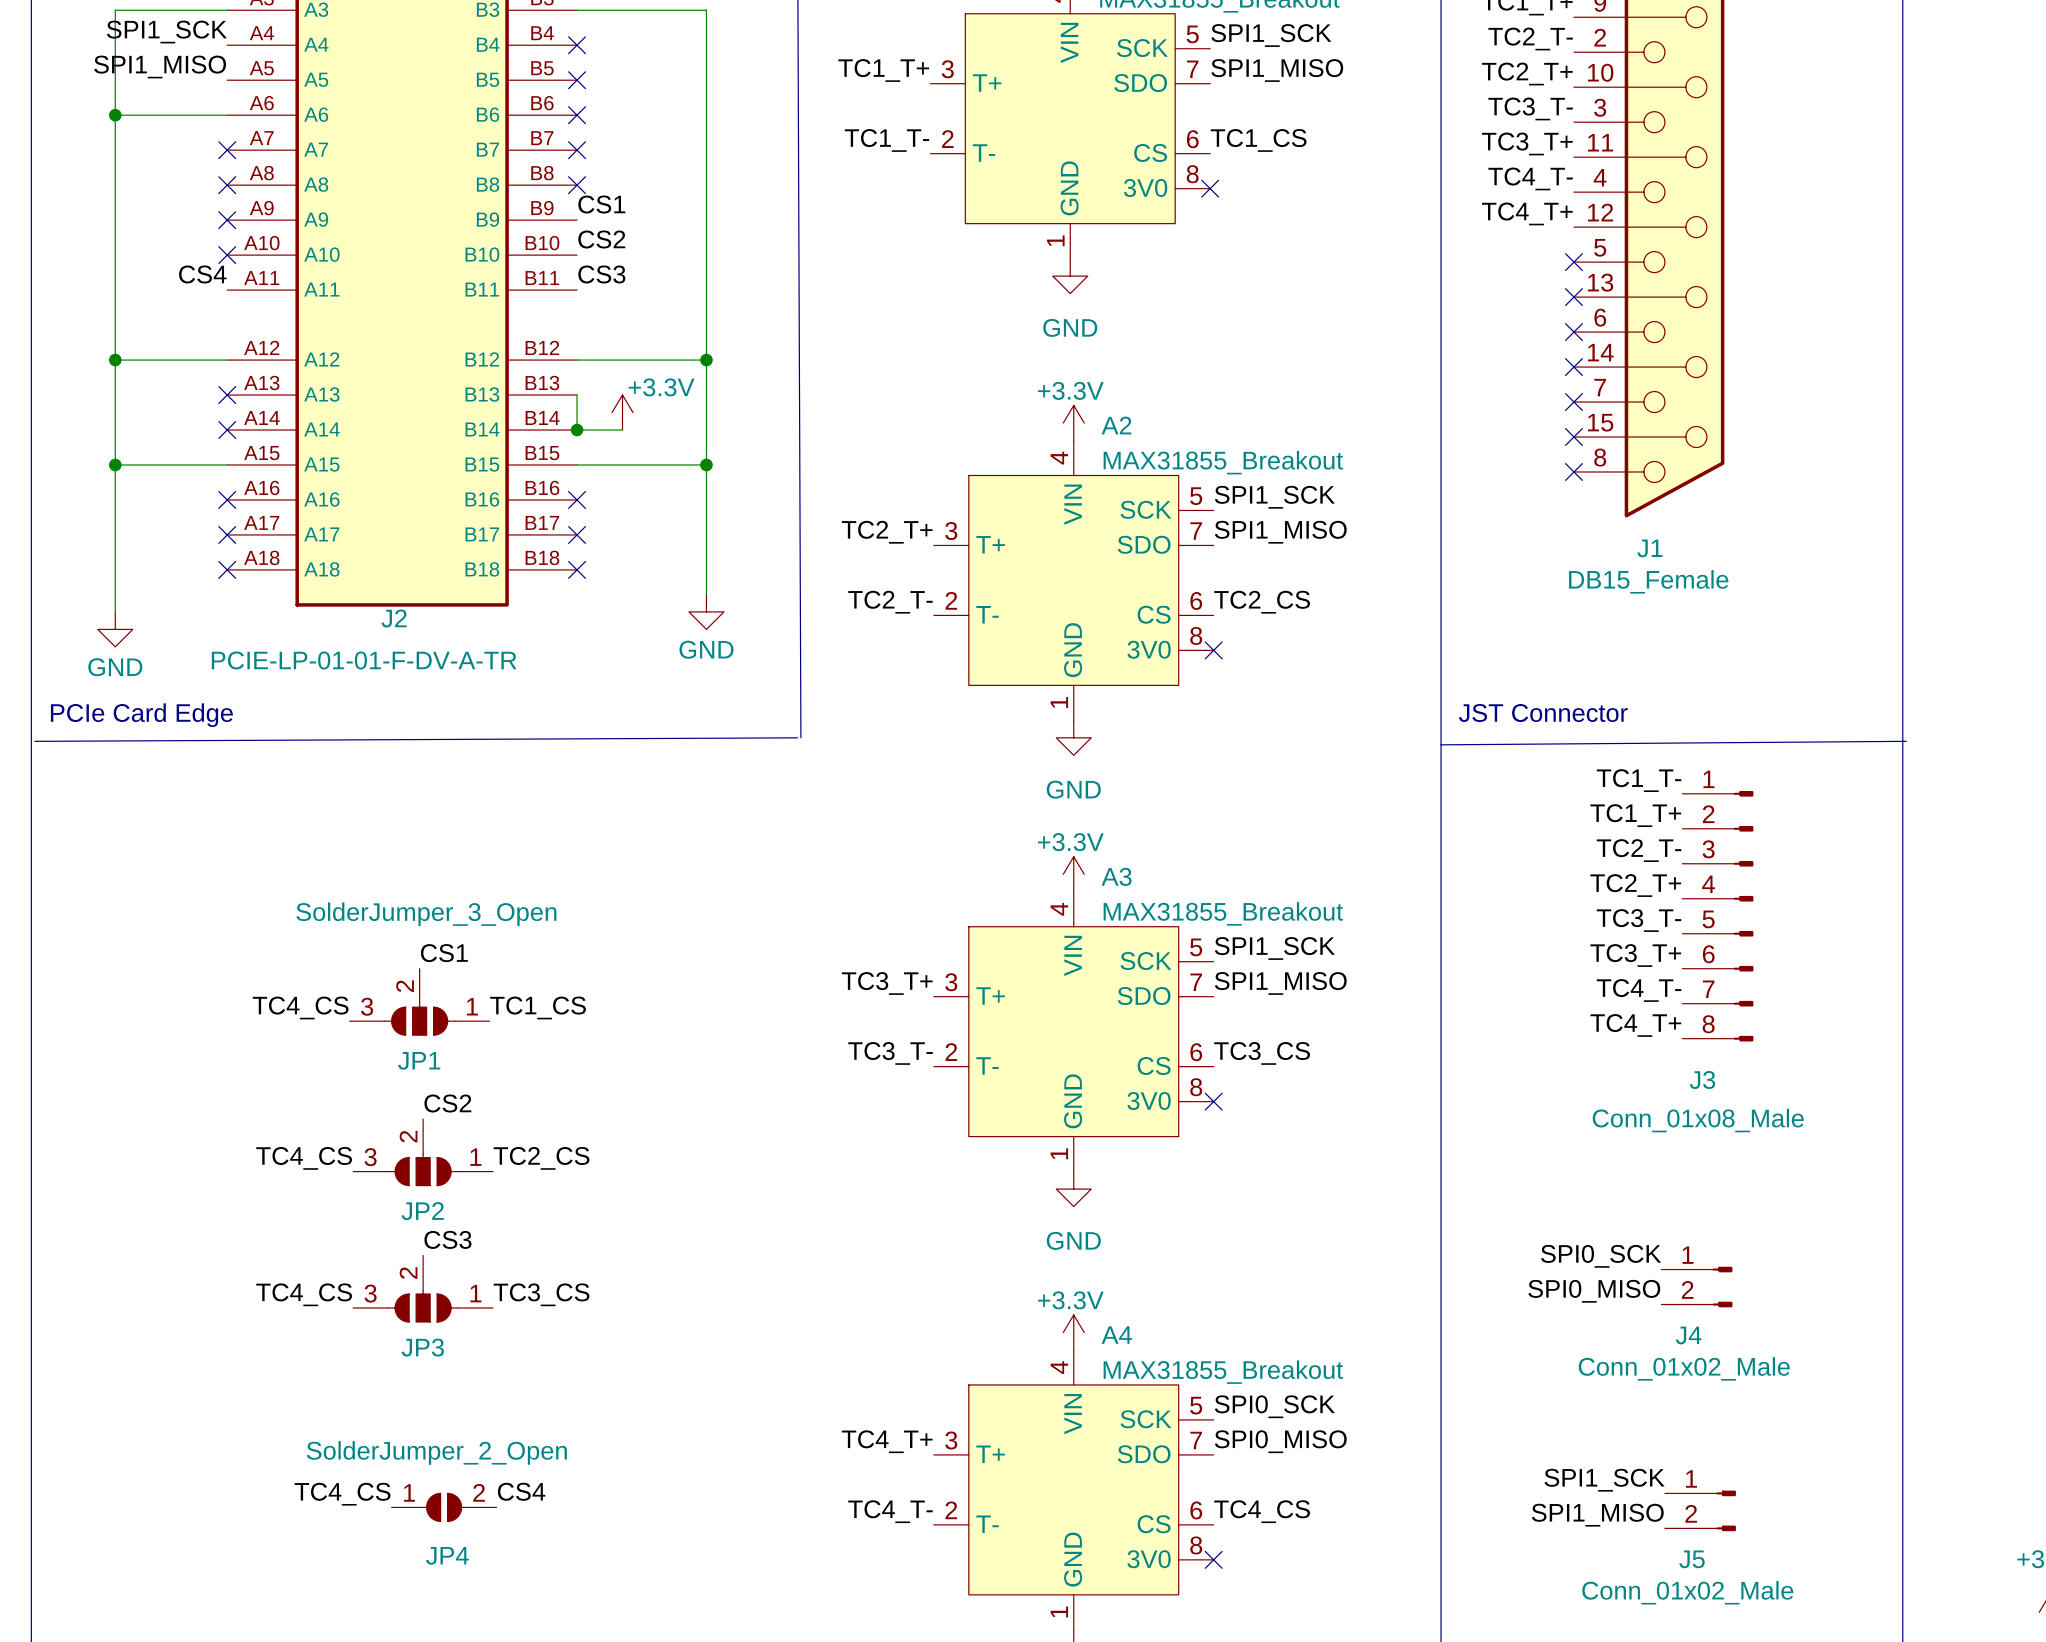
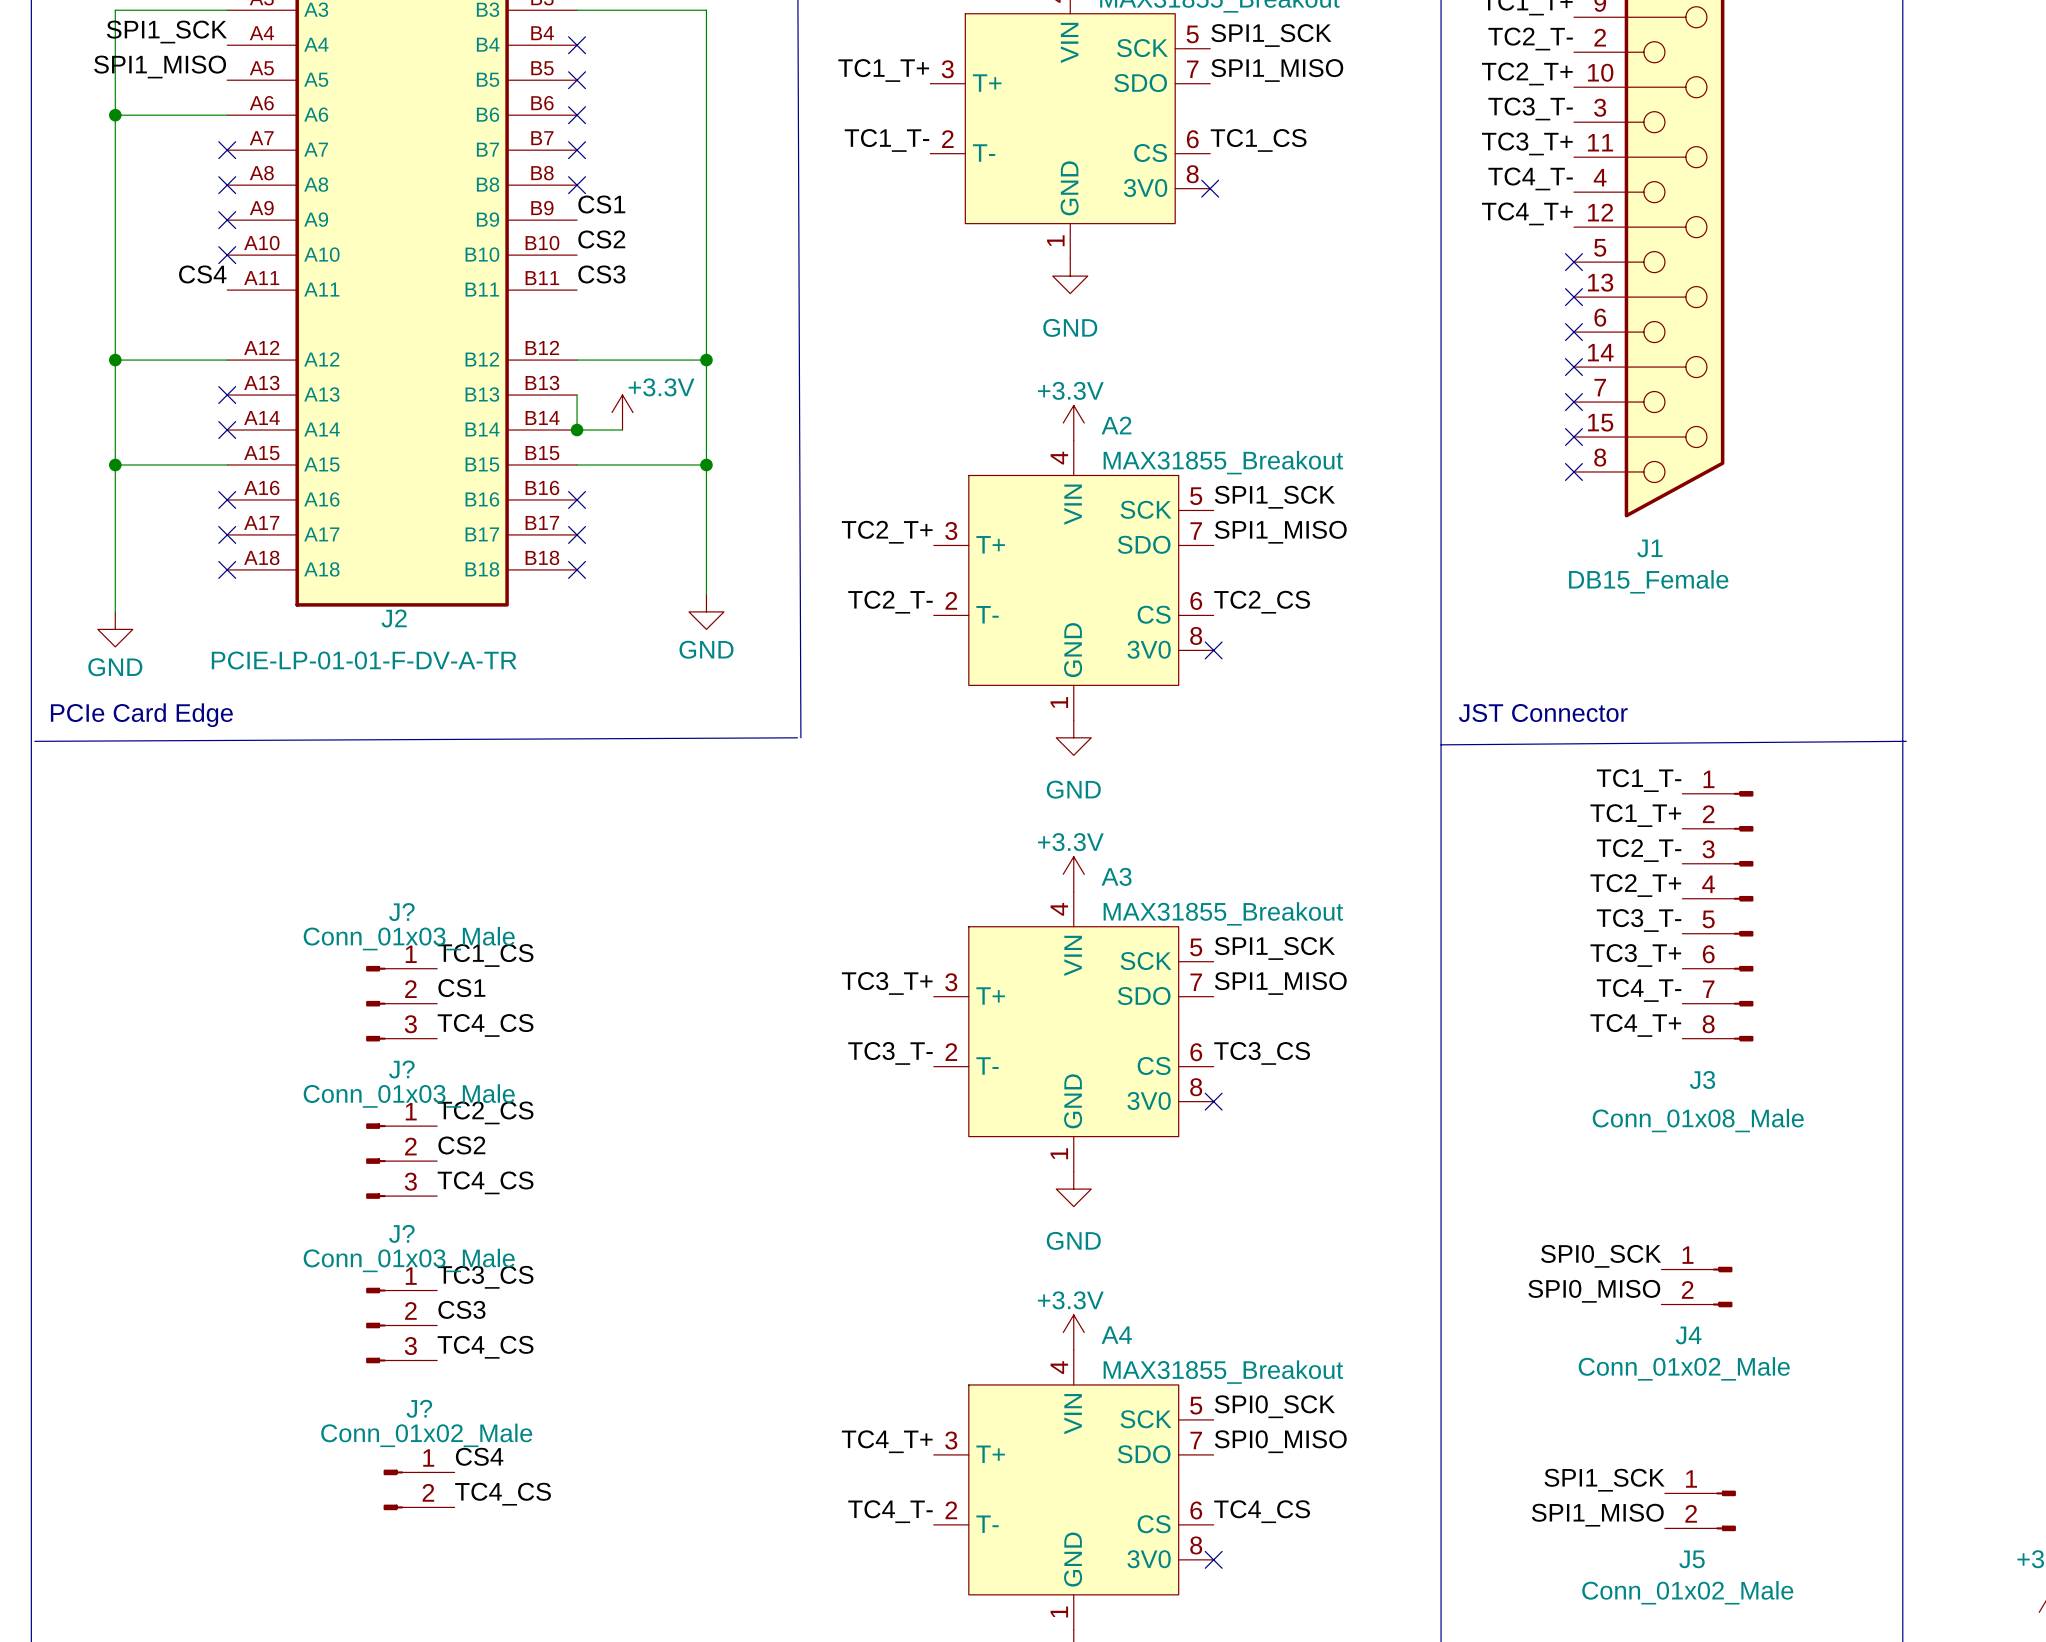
label position: CS1 (444, 953) -> CS1 (461, 988)
JP1: SolderJumper_3_Open (419, 1001) -> none
J?: none -> Conn_01x03_Male (401, 1003)
label: TC4_CS (300, 1007) -> none
label position: TC1_CS (538, 1007) -> TC1_CS (485, 955)
label: none -> TC4_CS (485, 1025)
label position: CS2 (447, 1103) -> CS2 (461, 1145)
JP2: (423, 1152) -> none
label: TC4_CS (304, 1158) -> none
label position: TC2_CS (541, 1158) -> TC2_CS (485, 1112)
J?: none -> Conn_01x03_Male (401, 1161)
label: none -> TC4_CS (485, 1182)
label position: CS3 (447, 1239) -> CS3 (461, 1309)
JP3: (423, 1288) -> none
label: TC4_CS (304, 1294) -> none
label position: TC3_CS (541, 1294) -> TC3_CS (485, 1277)
J?: none -> Conn_01x03_Male (401, 1325)
label: none -> TC4_CS (485, 1347)
J?: none -> Conn_01x02_Male (419, 1489)
label position: CS4 (521, 1491) -> CS4 (479, 1456)
label position: TC4_CS (342, 1494) -> TC4_CS (503, 1494)
JP4: SolderJumper_2_Open (444, 1507) -> none

